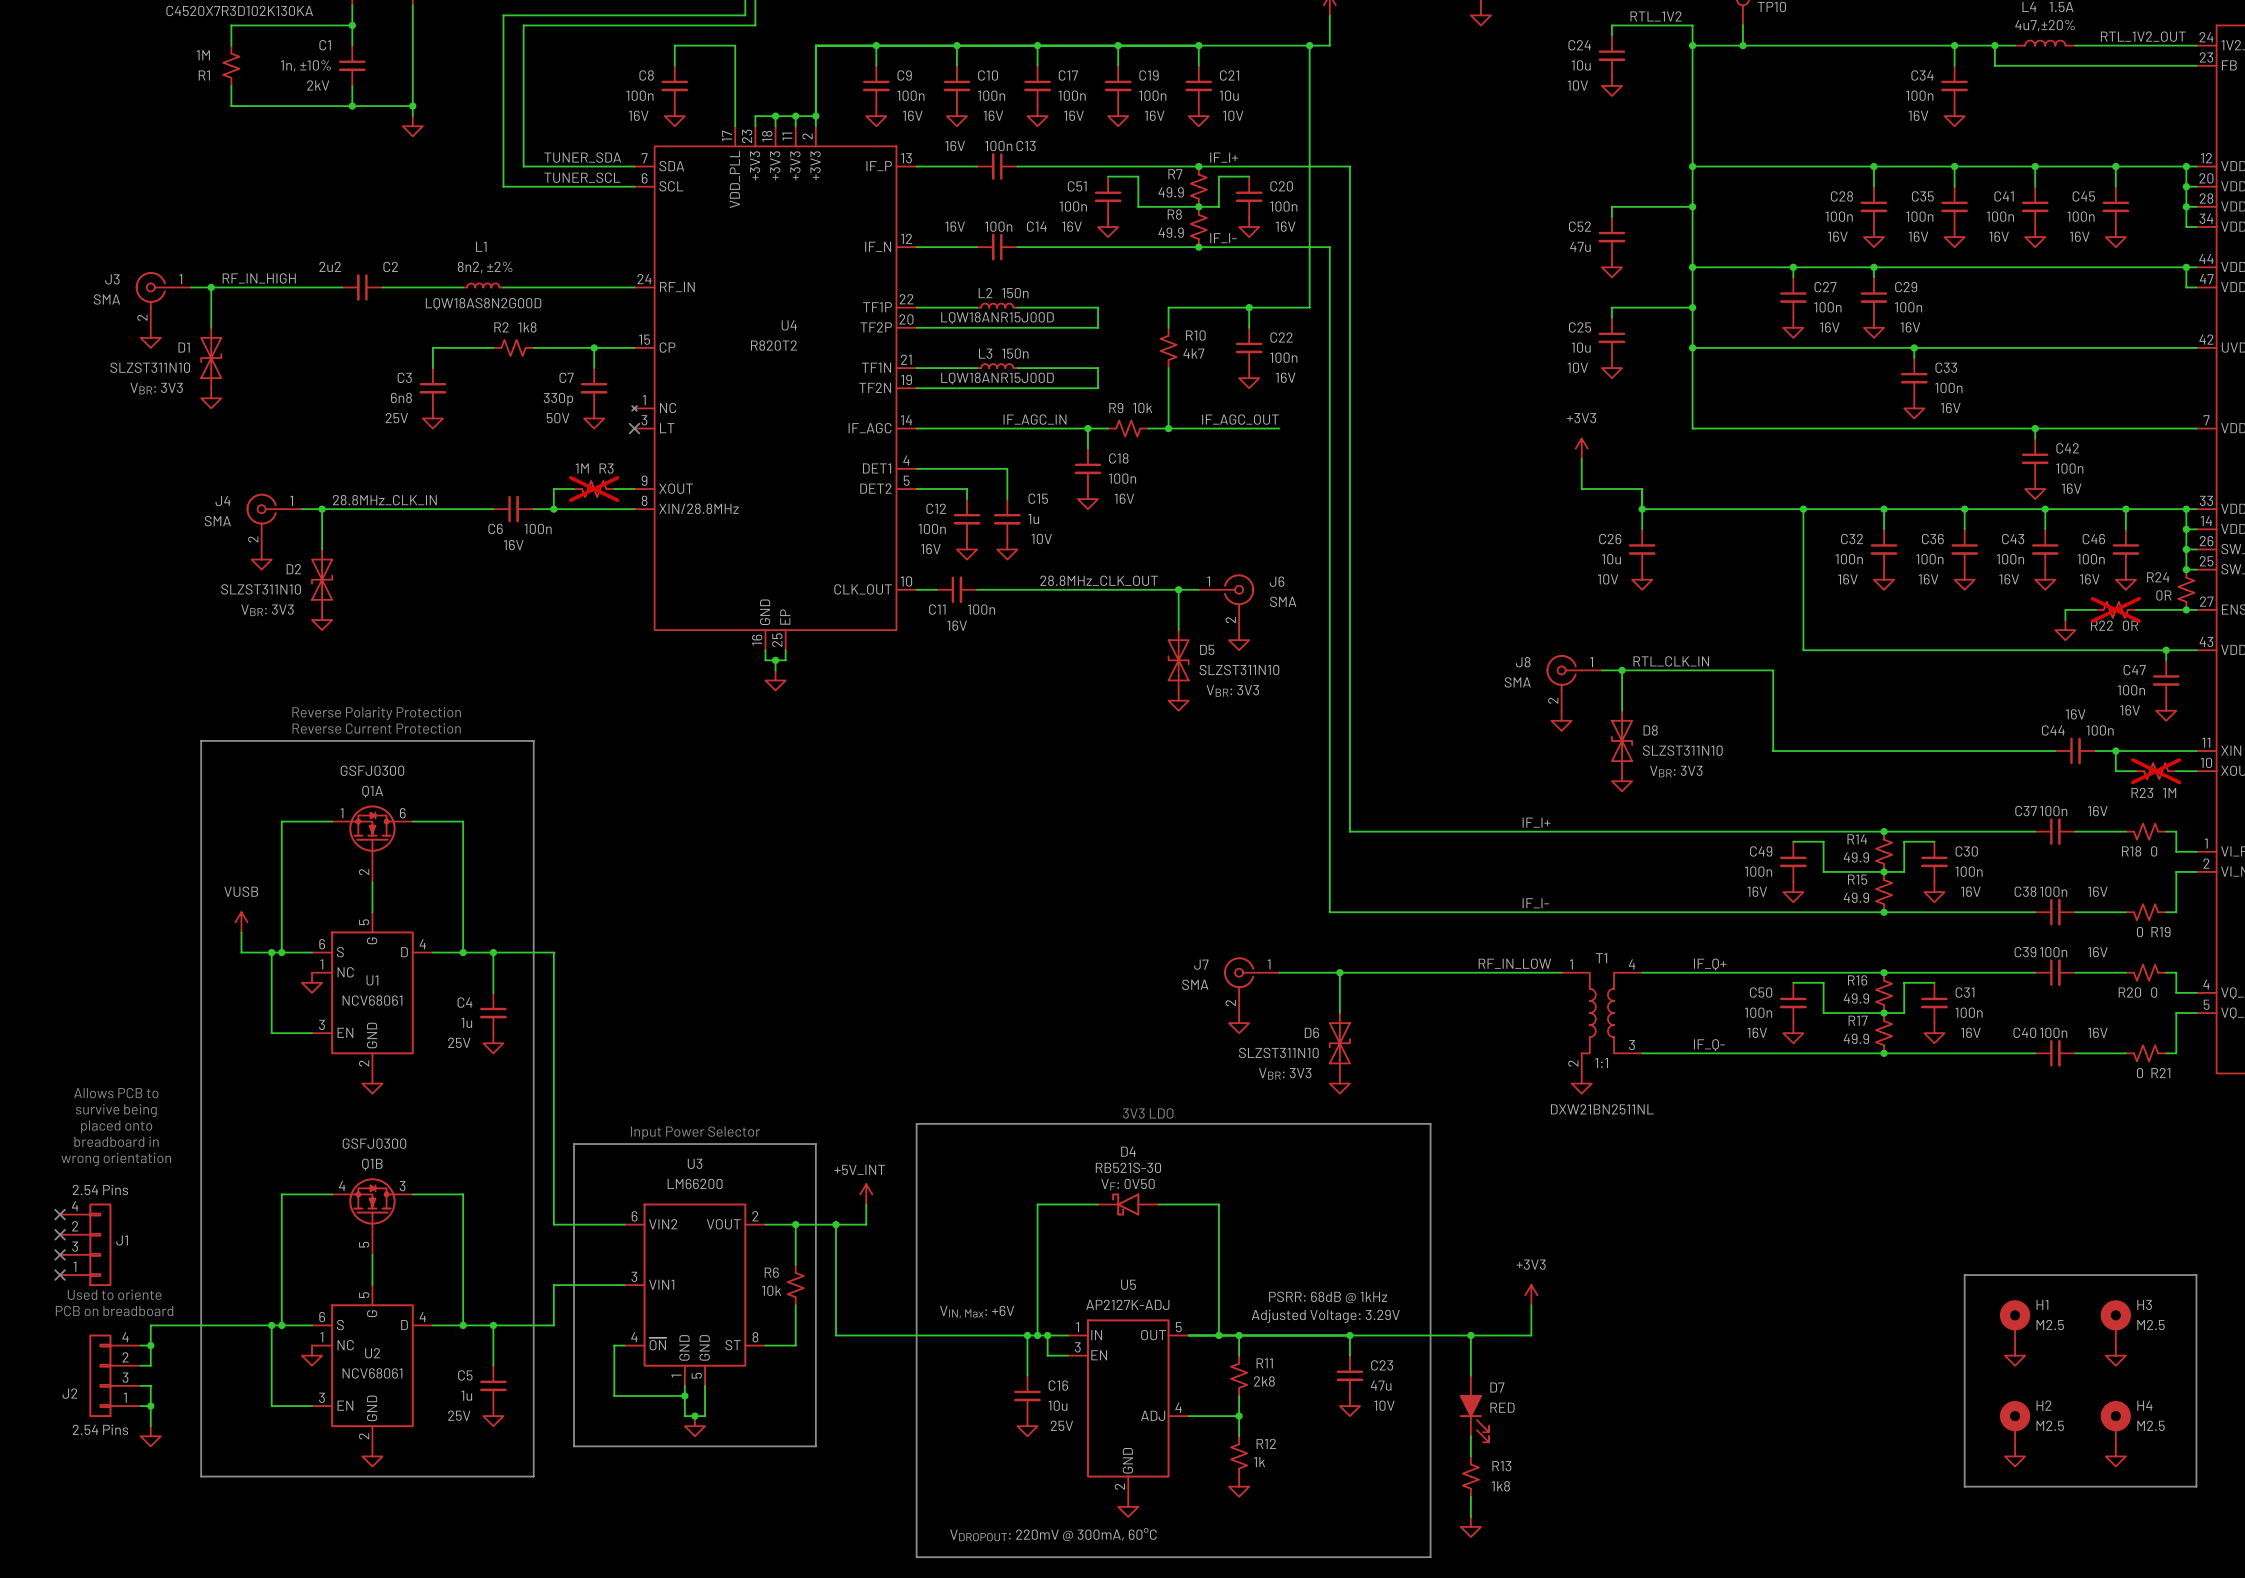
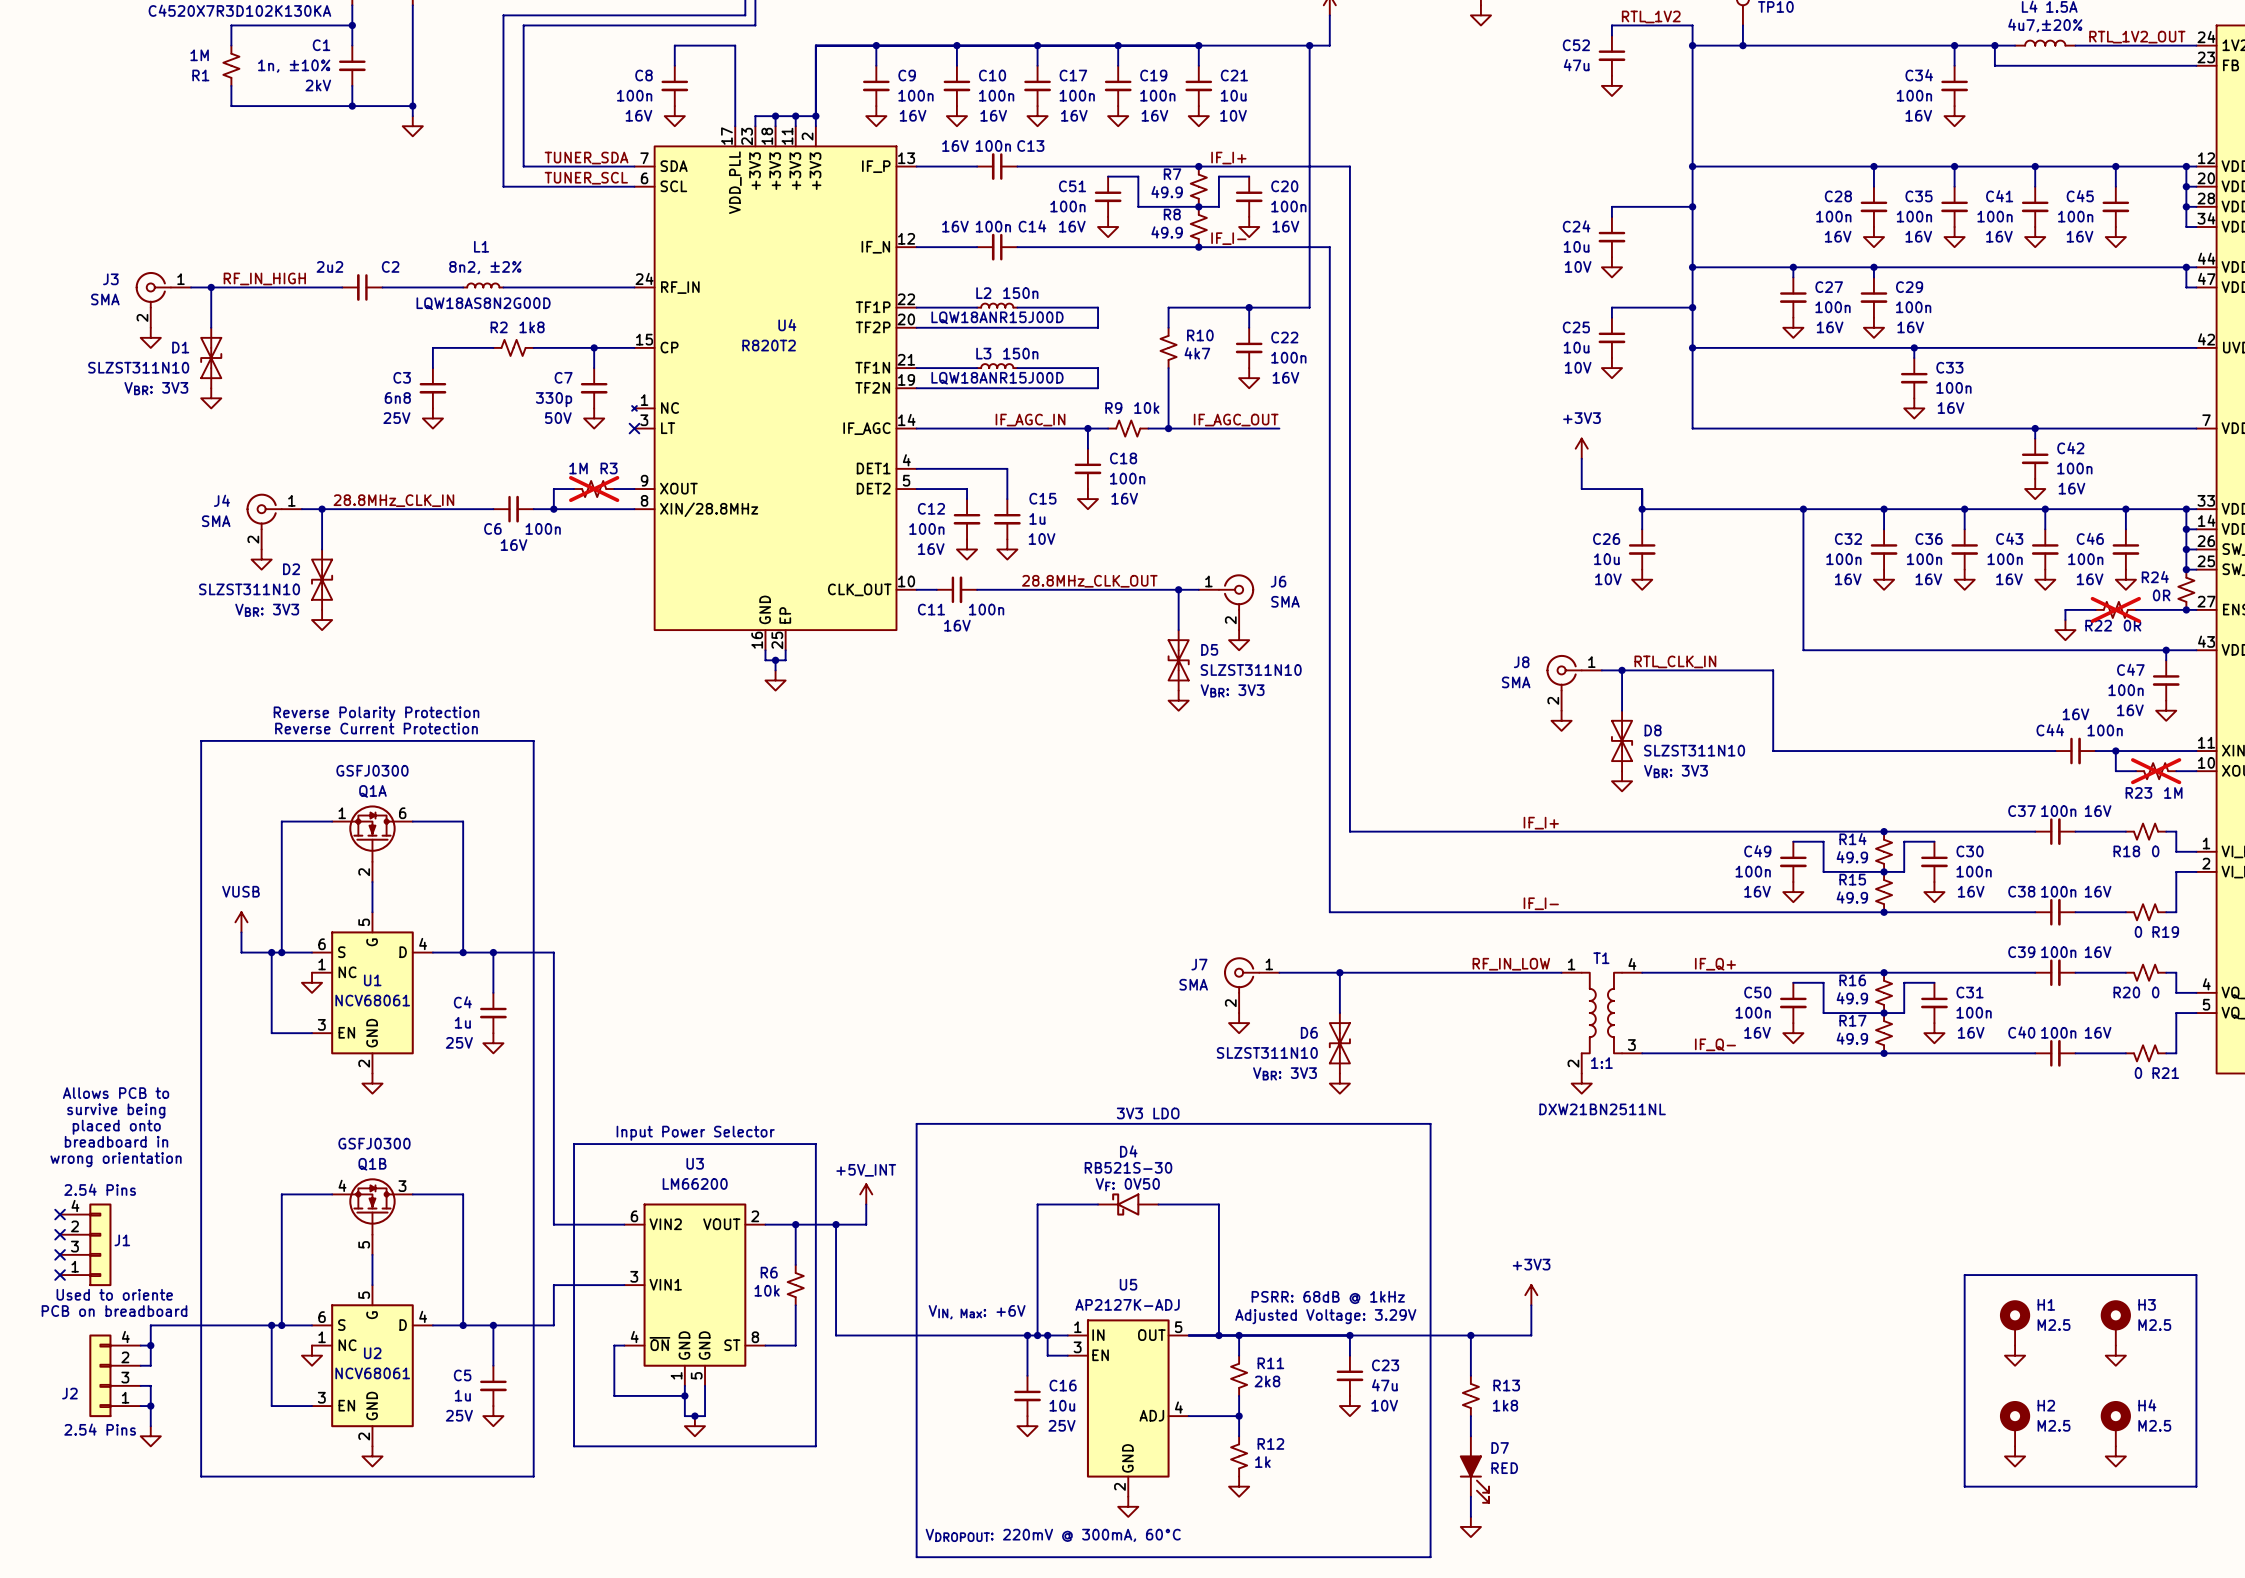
C24 name: C24 (1579, 45) -> C52 (1576, 45)
C24 value: 10u (1581, 65) -> 47u (1576, 65)
C24 text: 10V (1577, 85) -> none
C52 name: C52 (1579, 226) -> C24 (1576, 226)
C52 value: 47u (1580, 246) -> 10u (1576, 246)
C52 text: none -> 10V (1578, 266)
D7 position: (1474, 1409) -> (1474, 1469)
R13 position: (1470, 1476) -> (1470, 1395)

